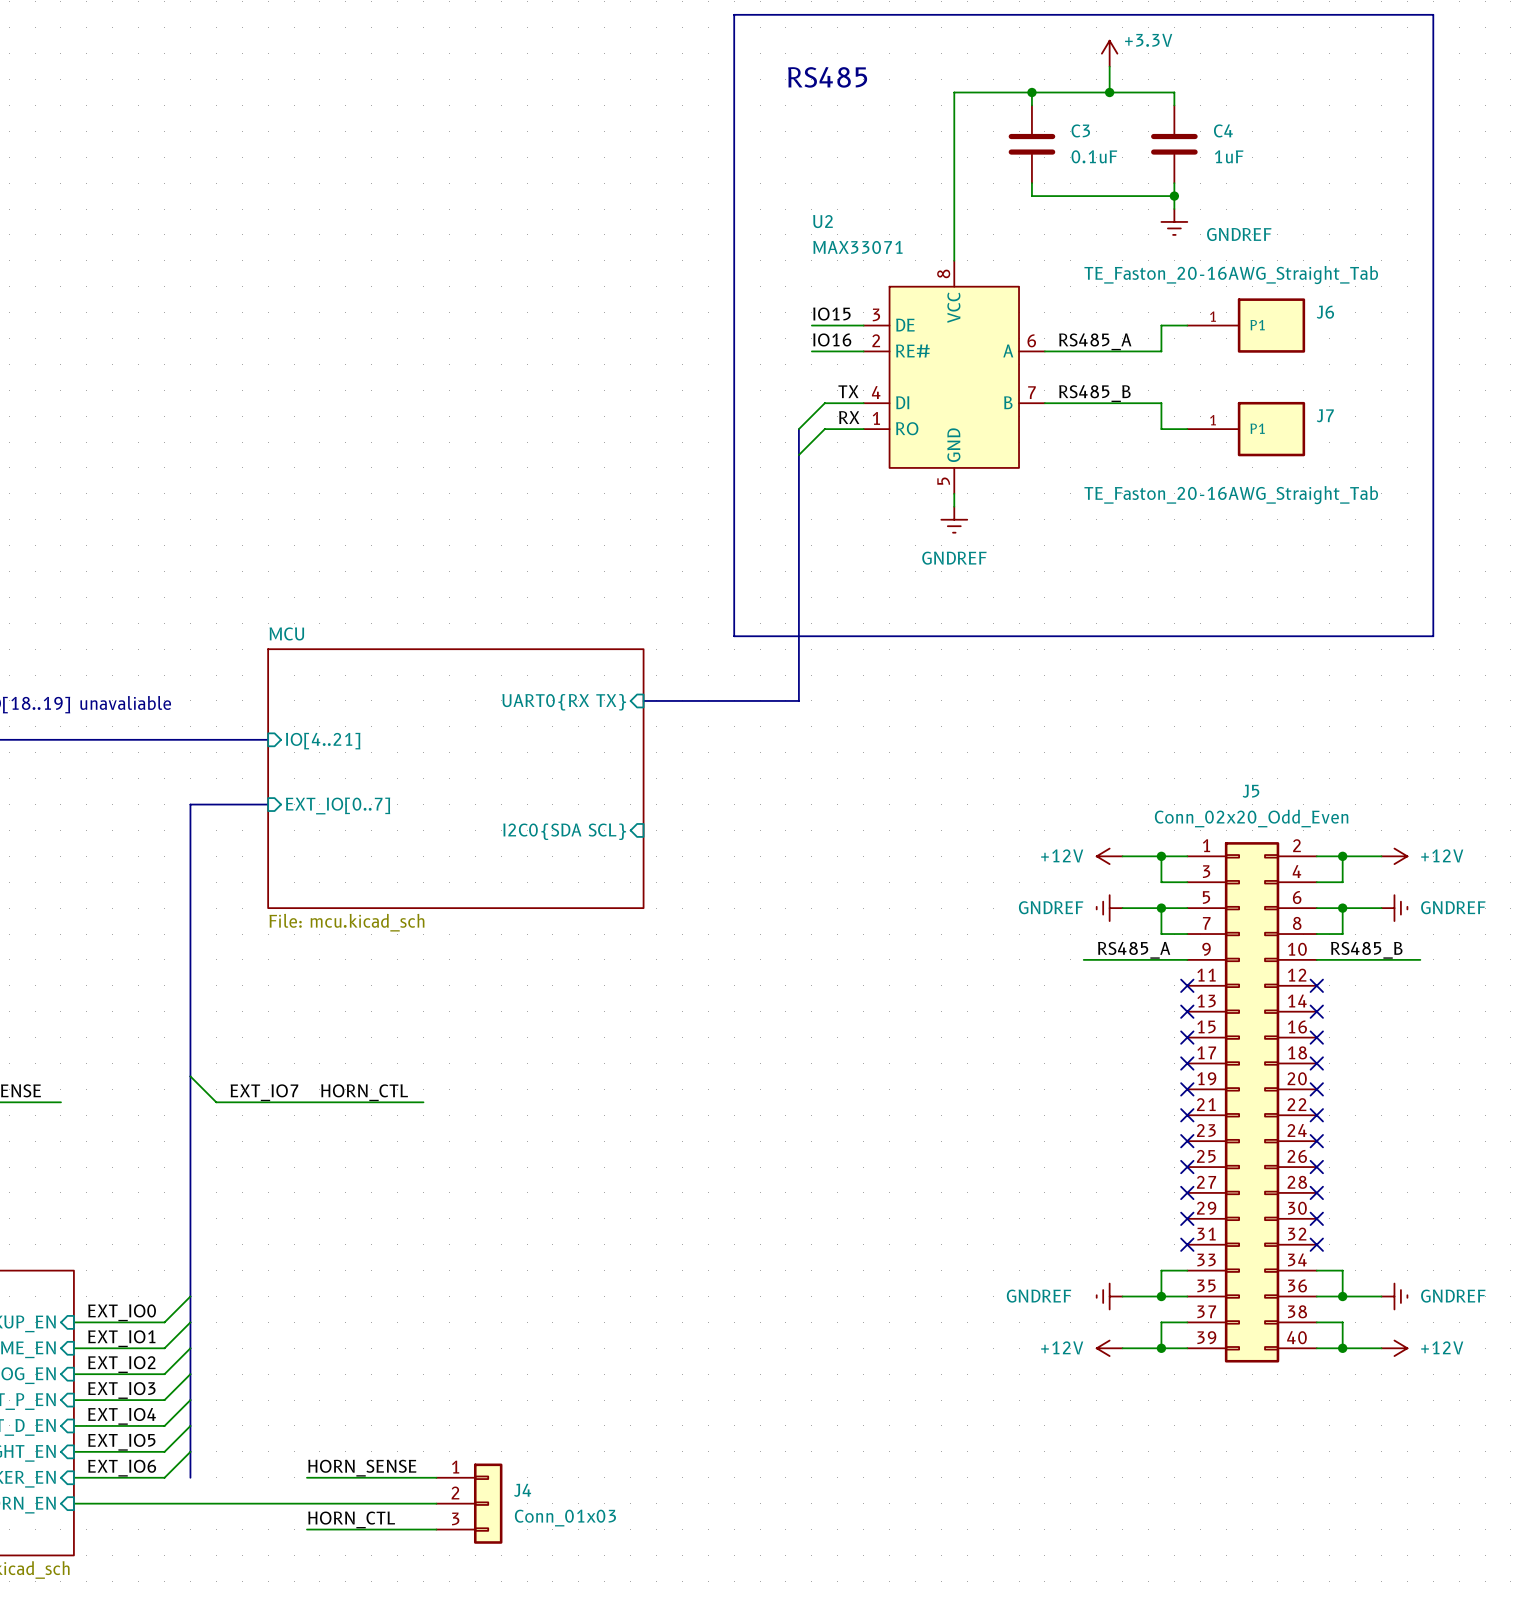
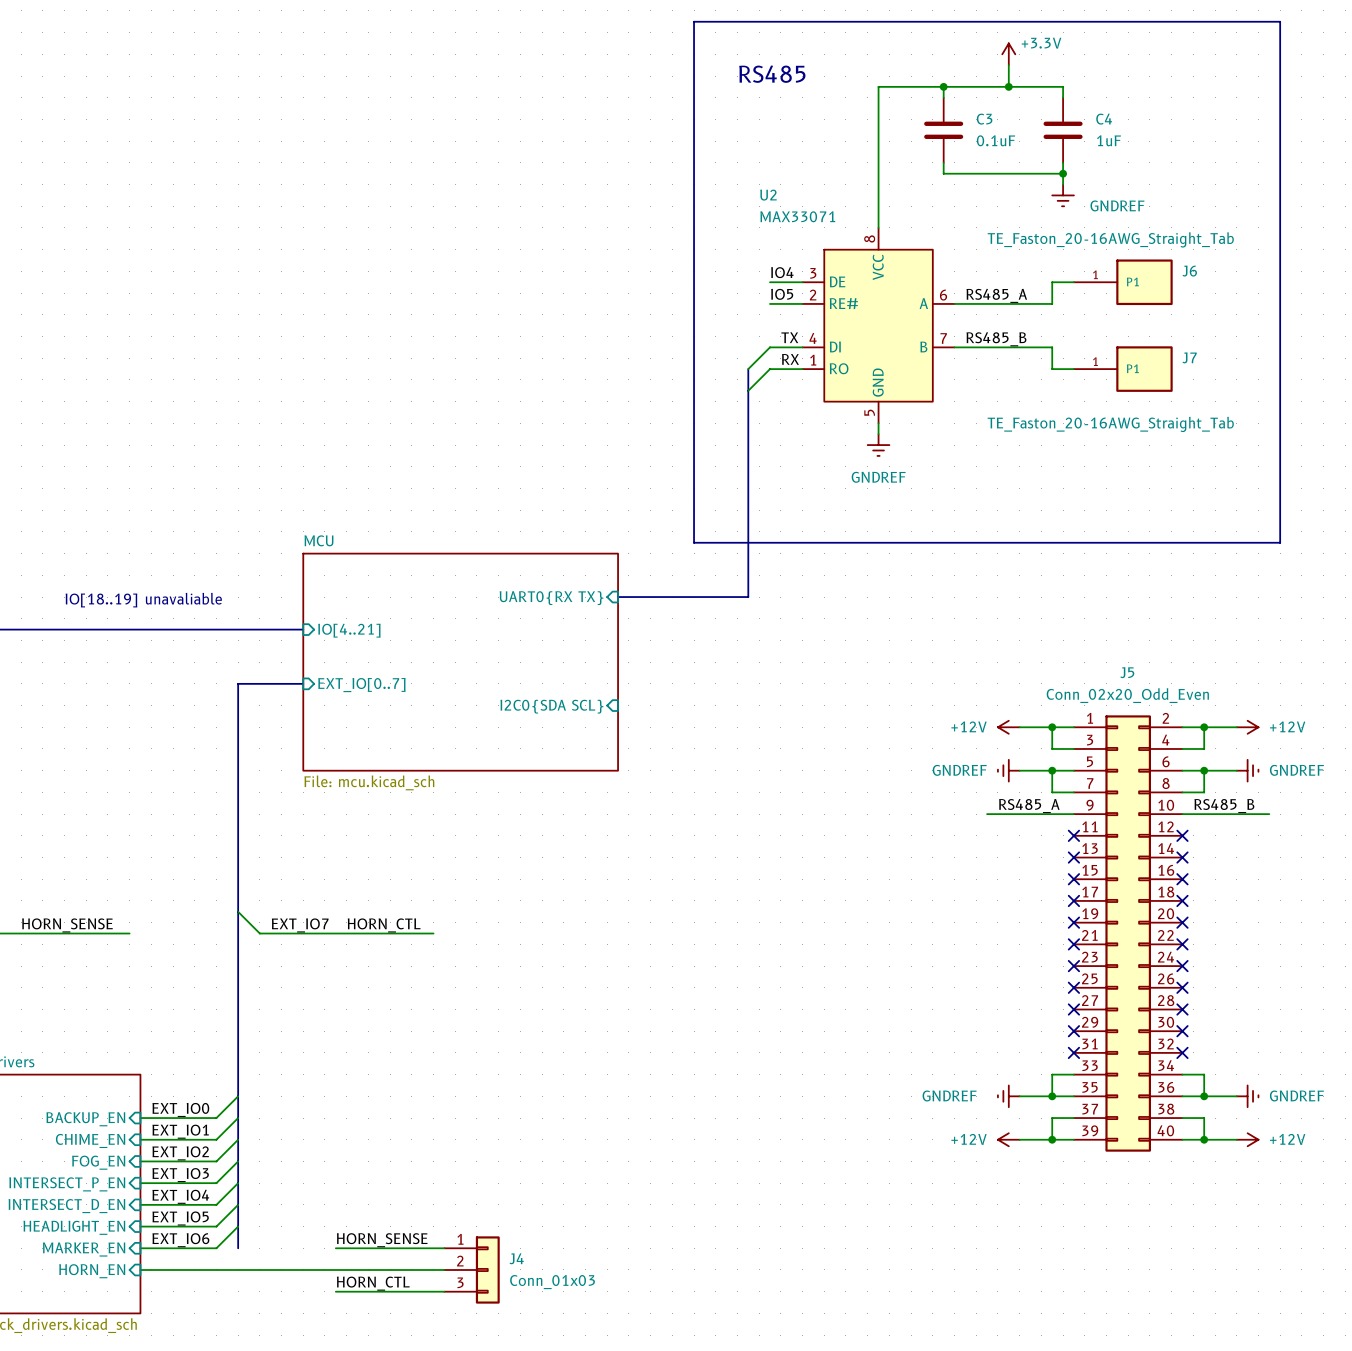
label: IO15 (831, 314) -> IO5 (782, 294)
label: none -> IO4 (782, 272)
wire: (811, 325) (824, 325) -> none
label: IO16 (832, 339) -> none
wire: (811, 351) (824, 351) -> none

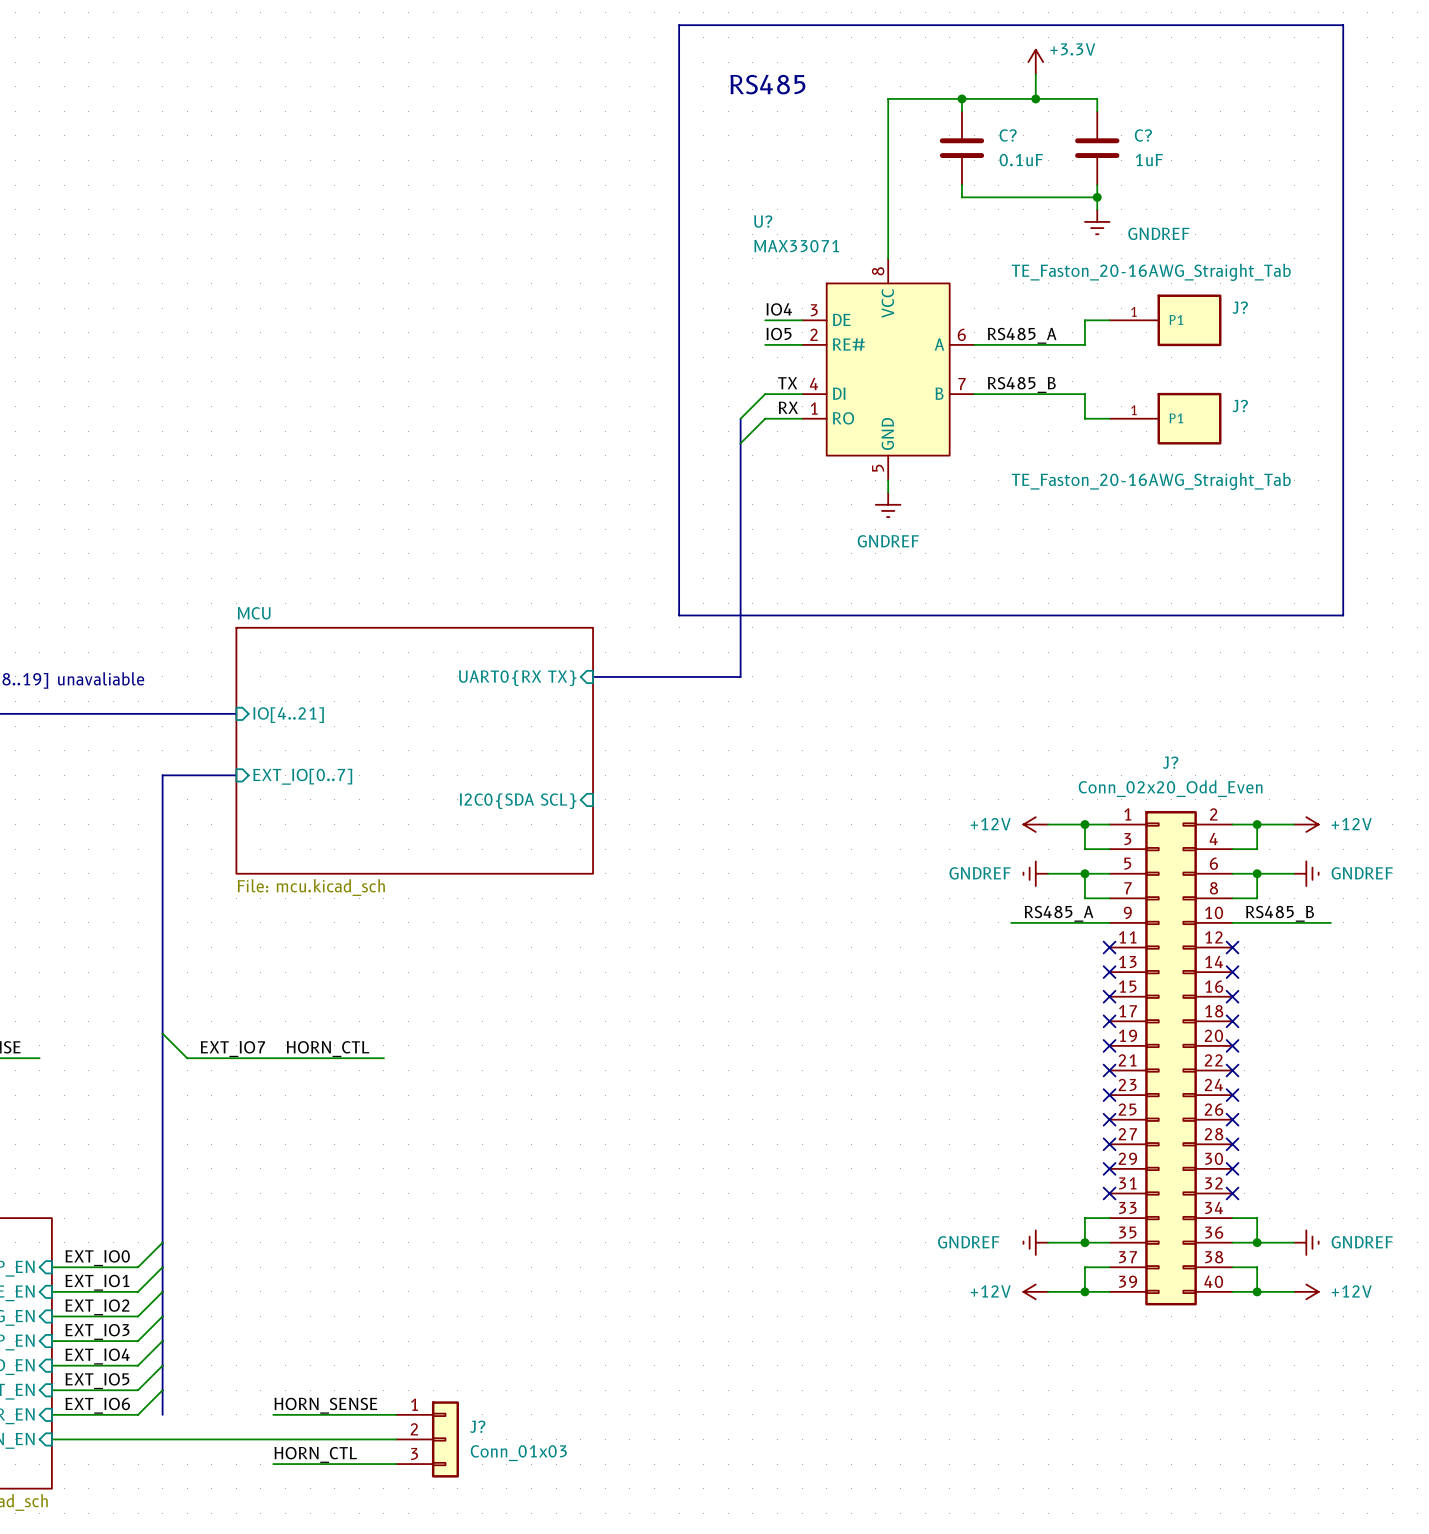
C3 name: C3 (984, 119) -> C? (1008, 135)
C4 name: C4 (1104, 119) -> C? (1143, 135)
U2 name: U2 (768, 195) -> U? (763, 221)
J6 name: J6 (1189, 271) -> J? (1240, 307)
J7 name: J7 (1189, 357) -> J? (1240, 406)
J5 name: J5 (1127, 672) -> J? (1170, 762)
J4 name: J4 (516, 1258) -> J? (477, 1426)

